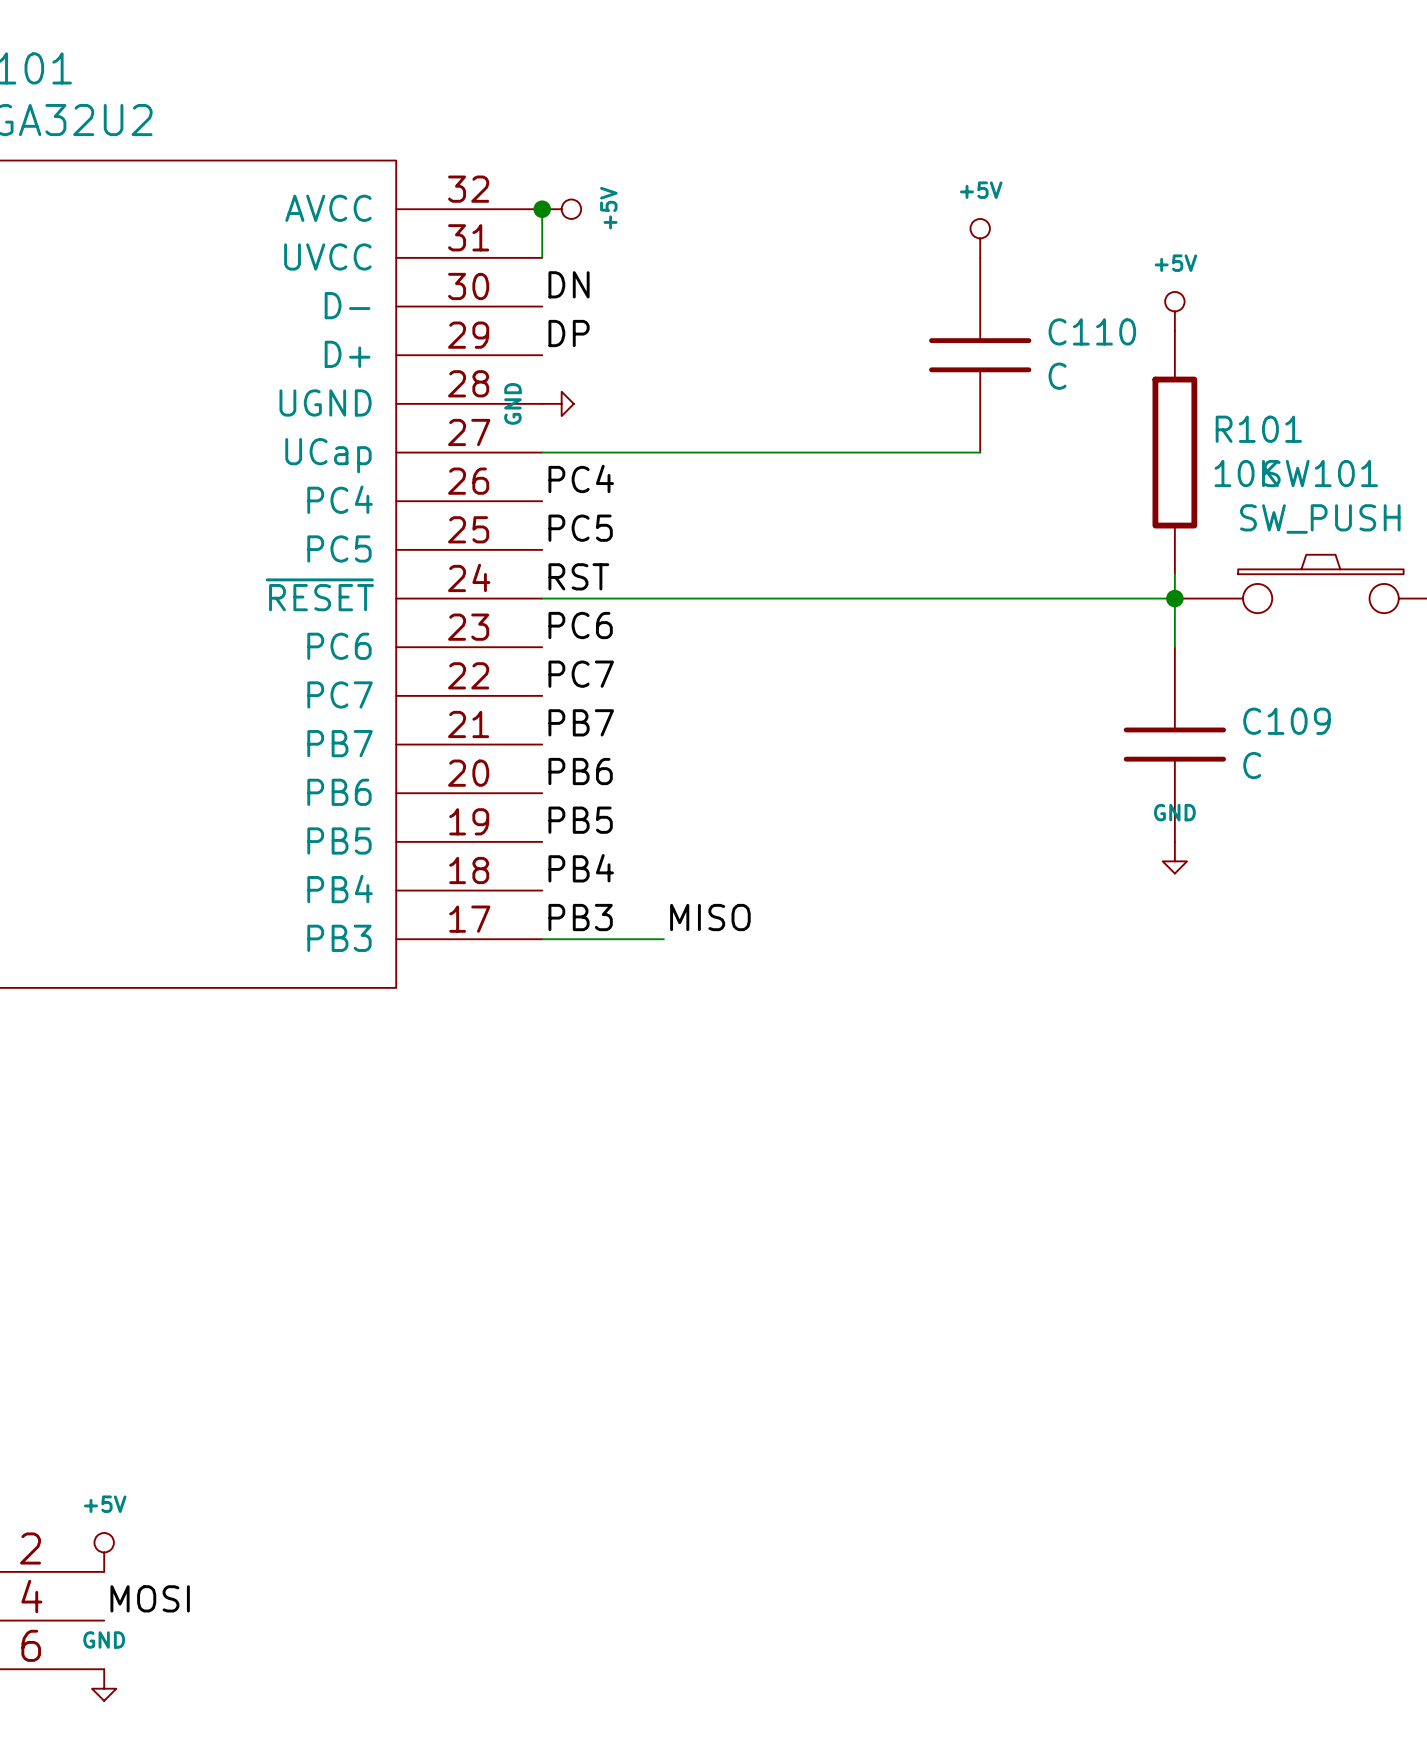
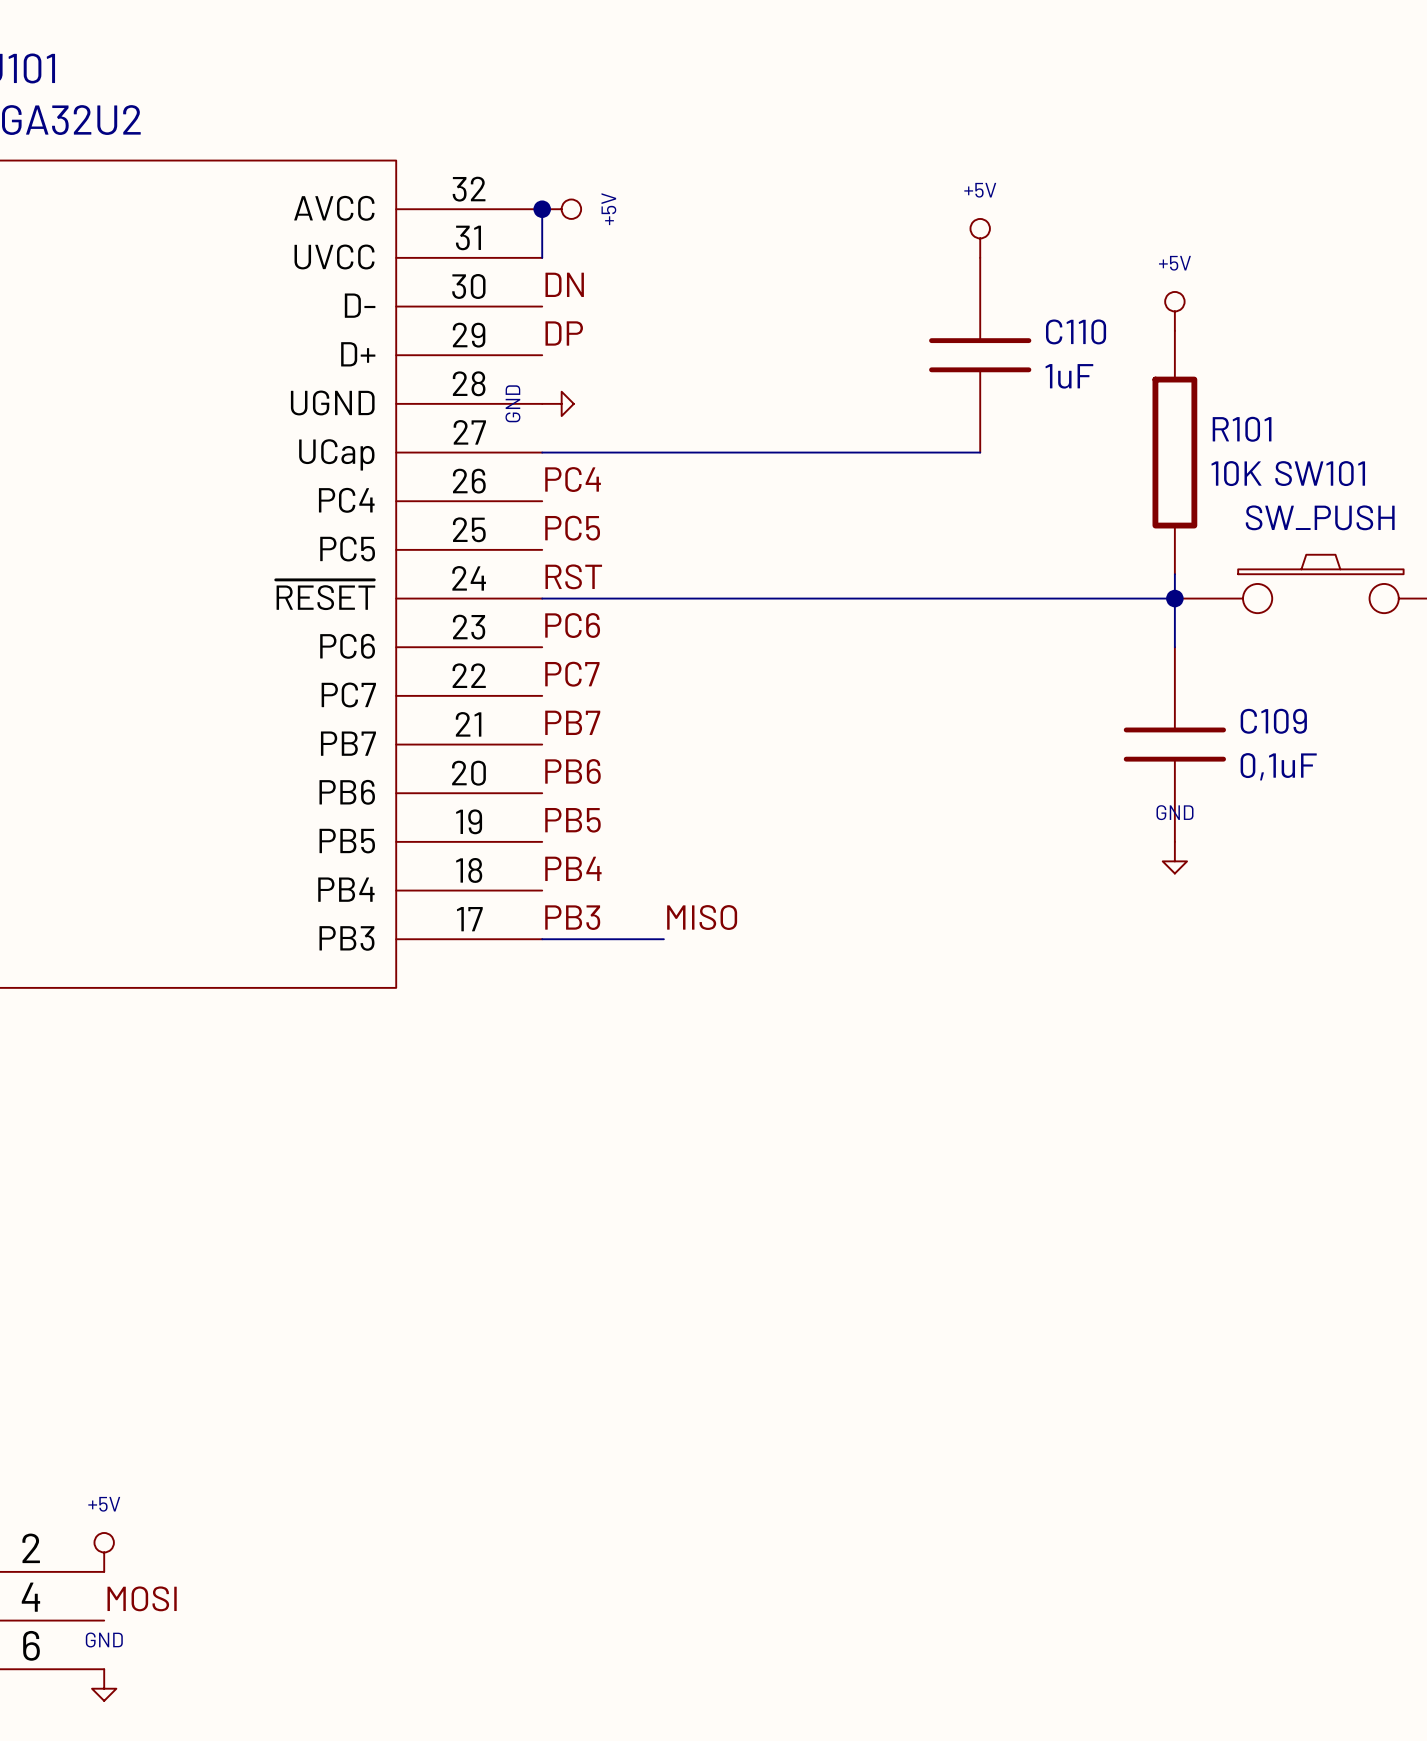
C110 value: C (1057, 376) -> 1uF (1069, 376)
C109 value: C (1252, 765) -> 0,1uF (1278, 766)

